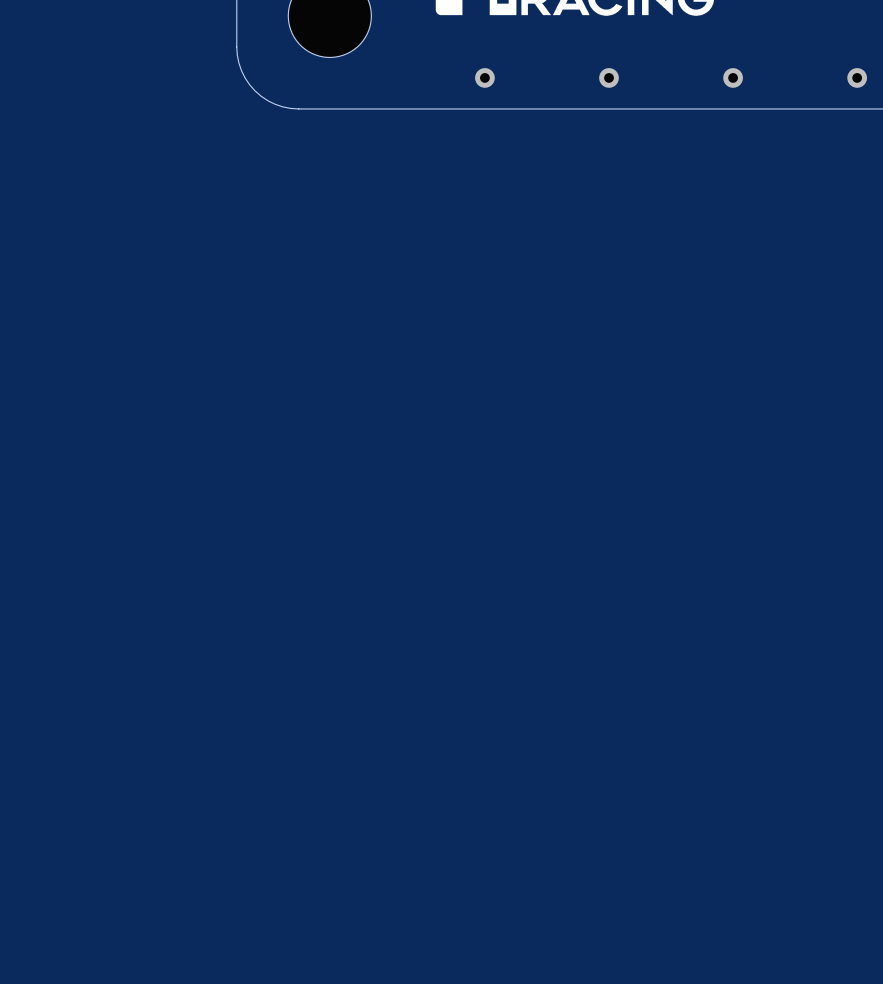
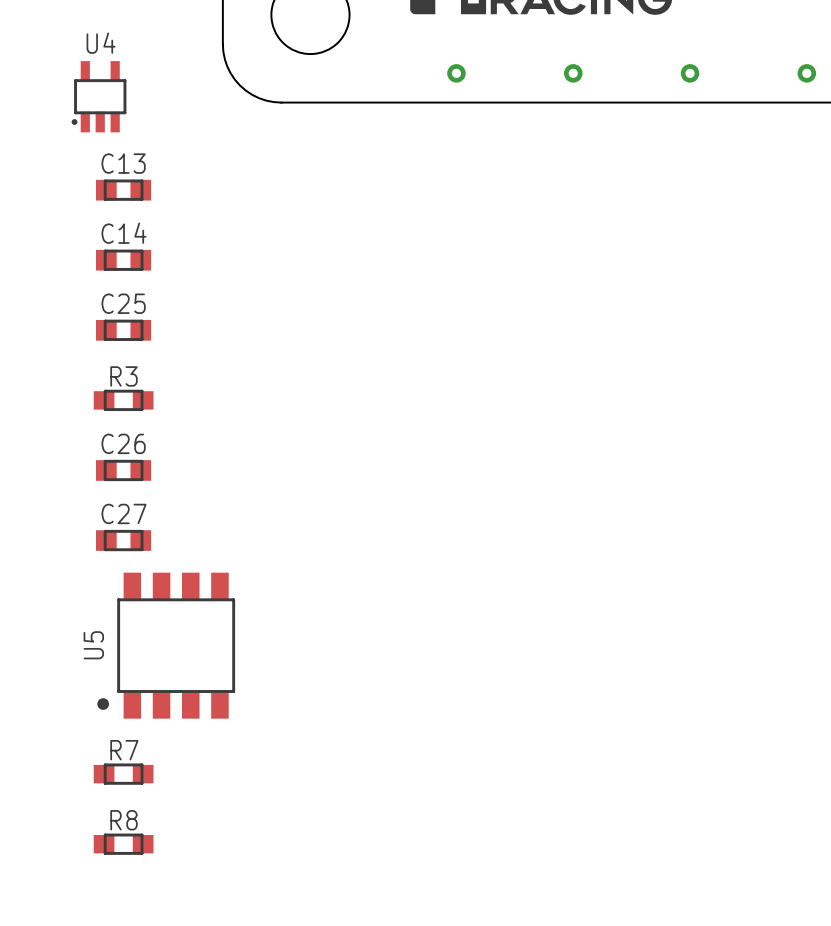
U4: none -> (99, 96)
C13: none -> (123, 190)
C14: none -> (123, 260)
C25: none -> (123, 330)
R3: none -> (123, 400)
C26: none -> (123, 470)
C27: none -> (123, 540)
U5: none -> (166, 645)
R7: none -> (123, 774)
R8: none -> (123, 844)

